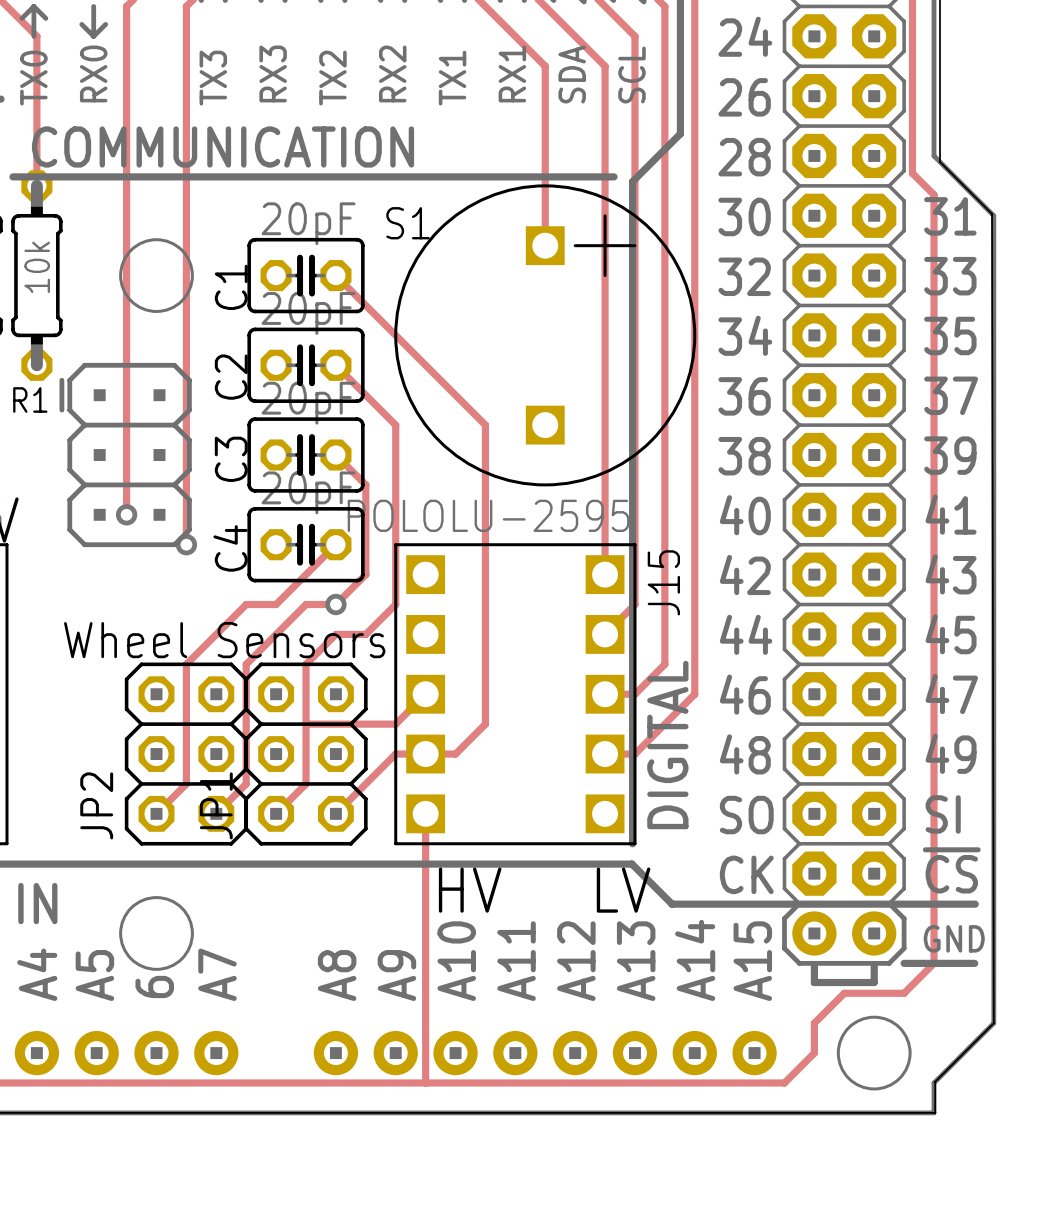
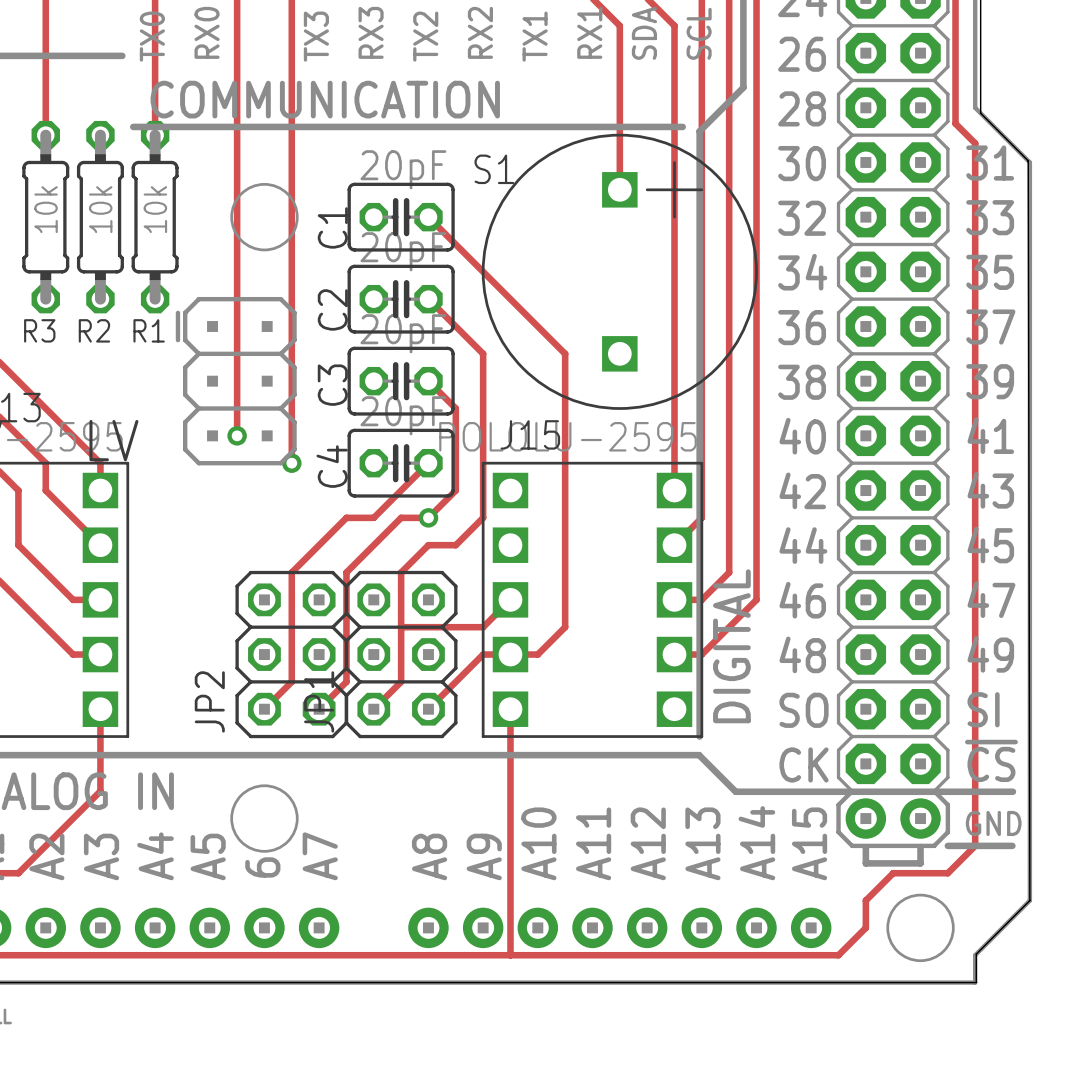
J15 name rotation: 0° (663, 582) -> 90° clockwise (530, 434)
J15 name position: J15 (663, 582) -> J15 (530, 434)
text: Wheel Sensors (224, 640) -> none
text: HV LV (544, 890) -> none

